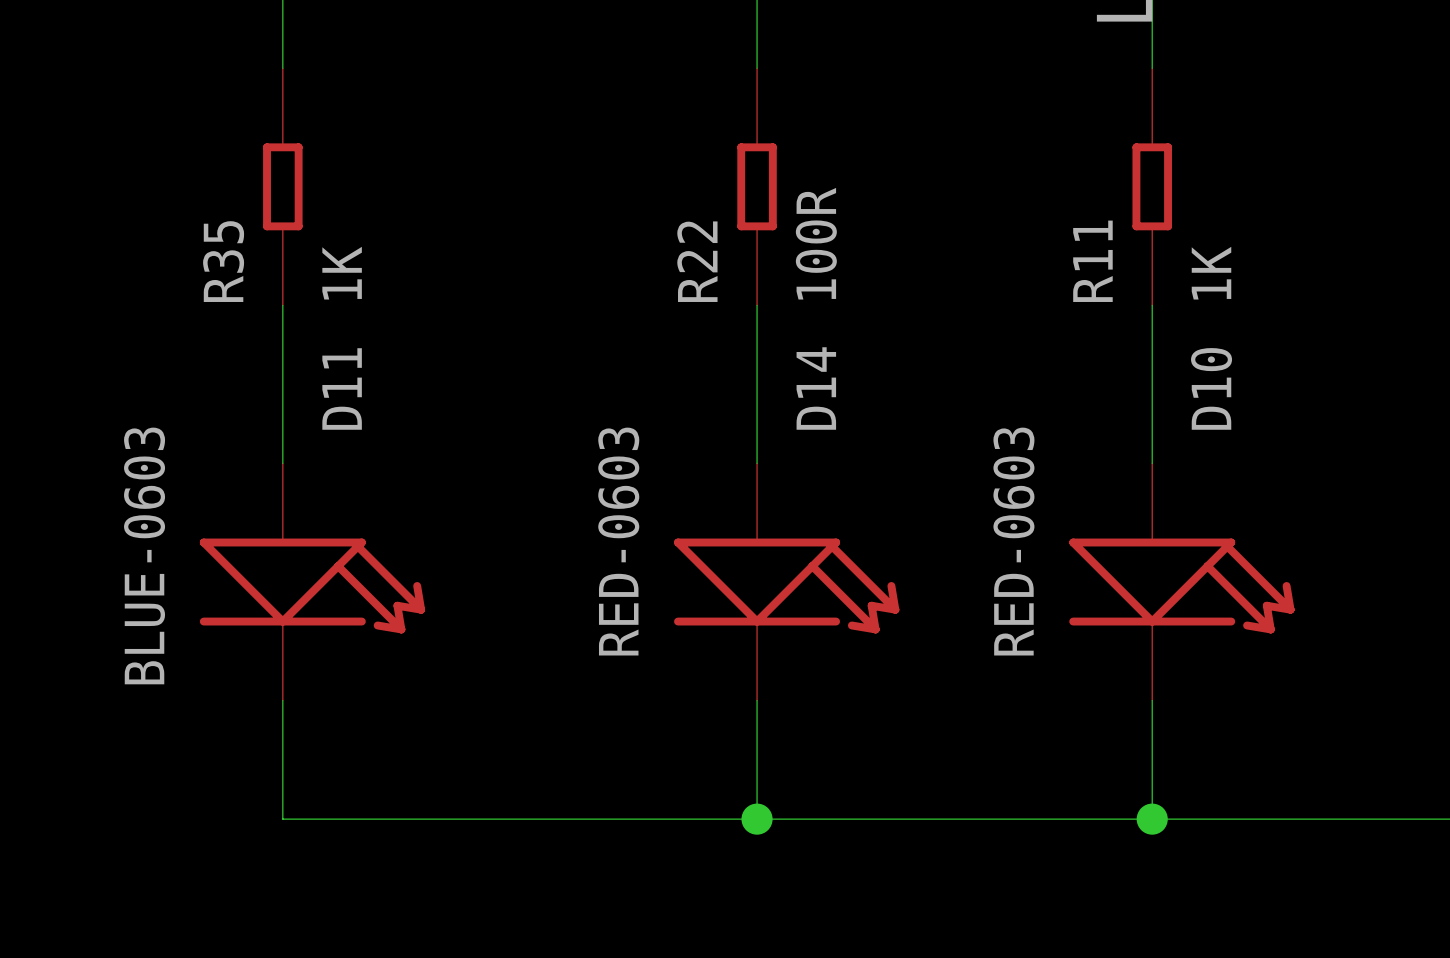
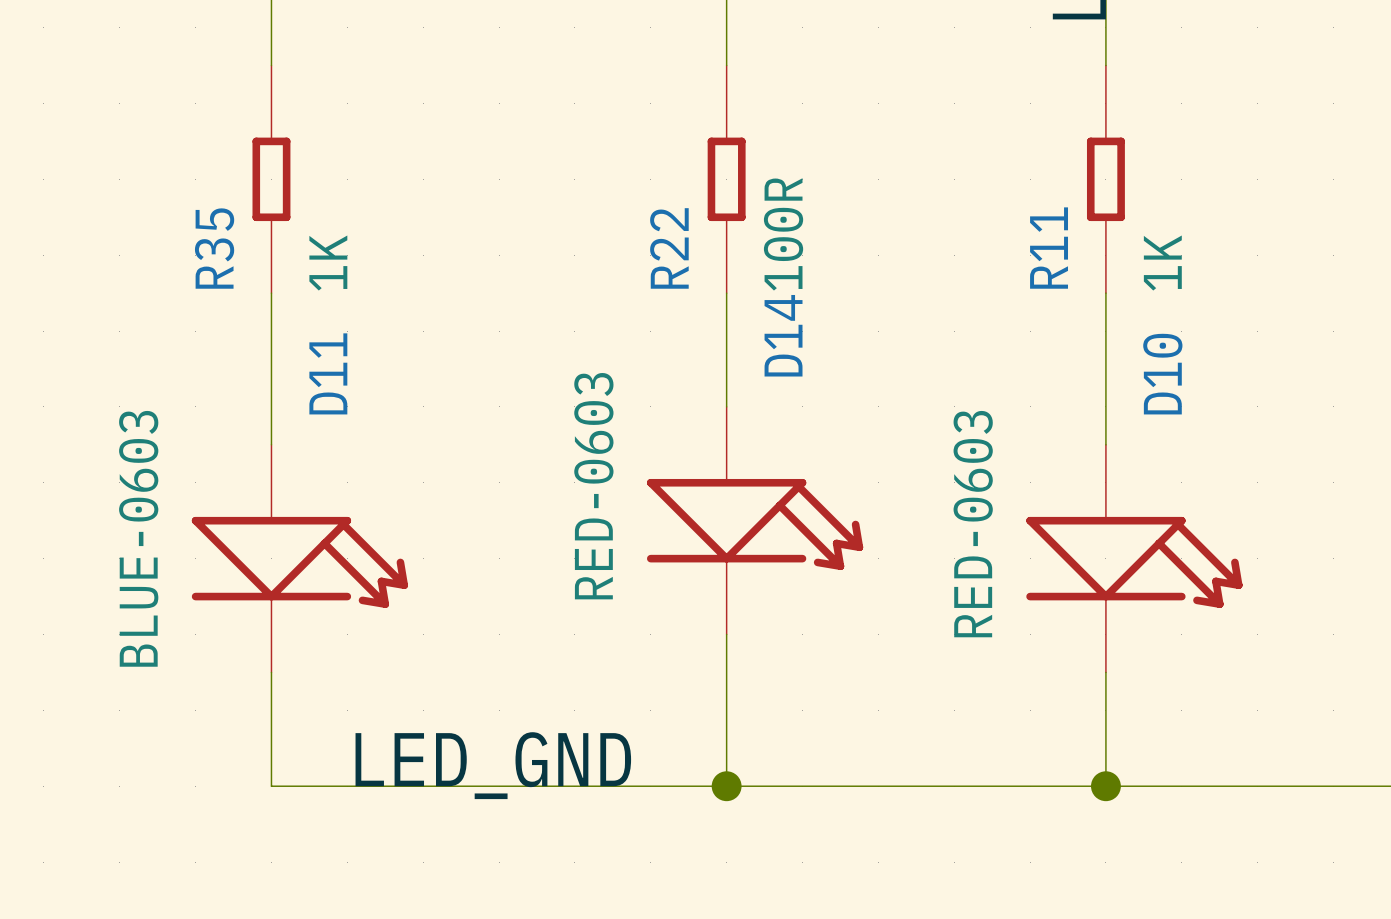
D14 position: (786, 582) -> (755, 520)
label: none -> LED_GND (493, 765)

